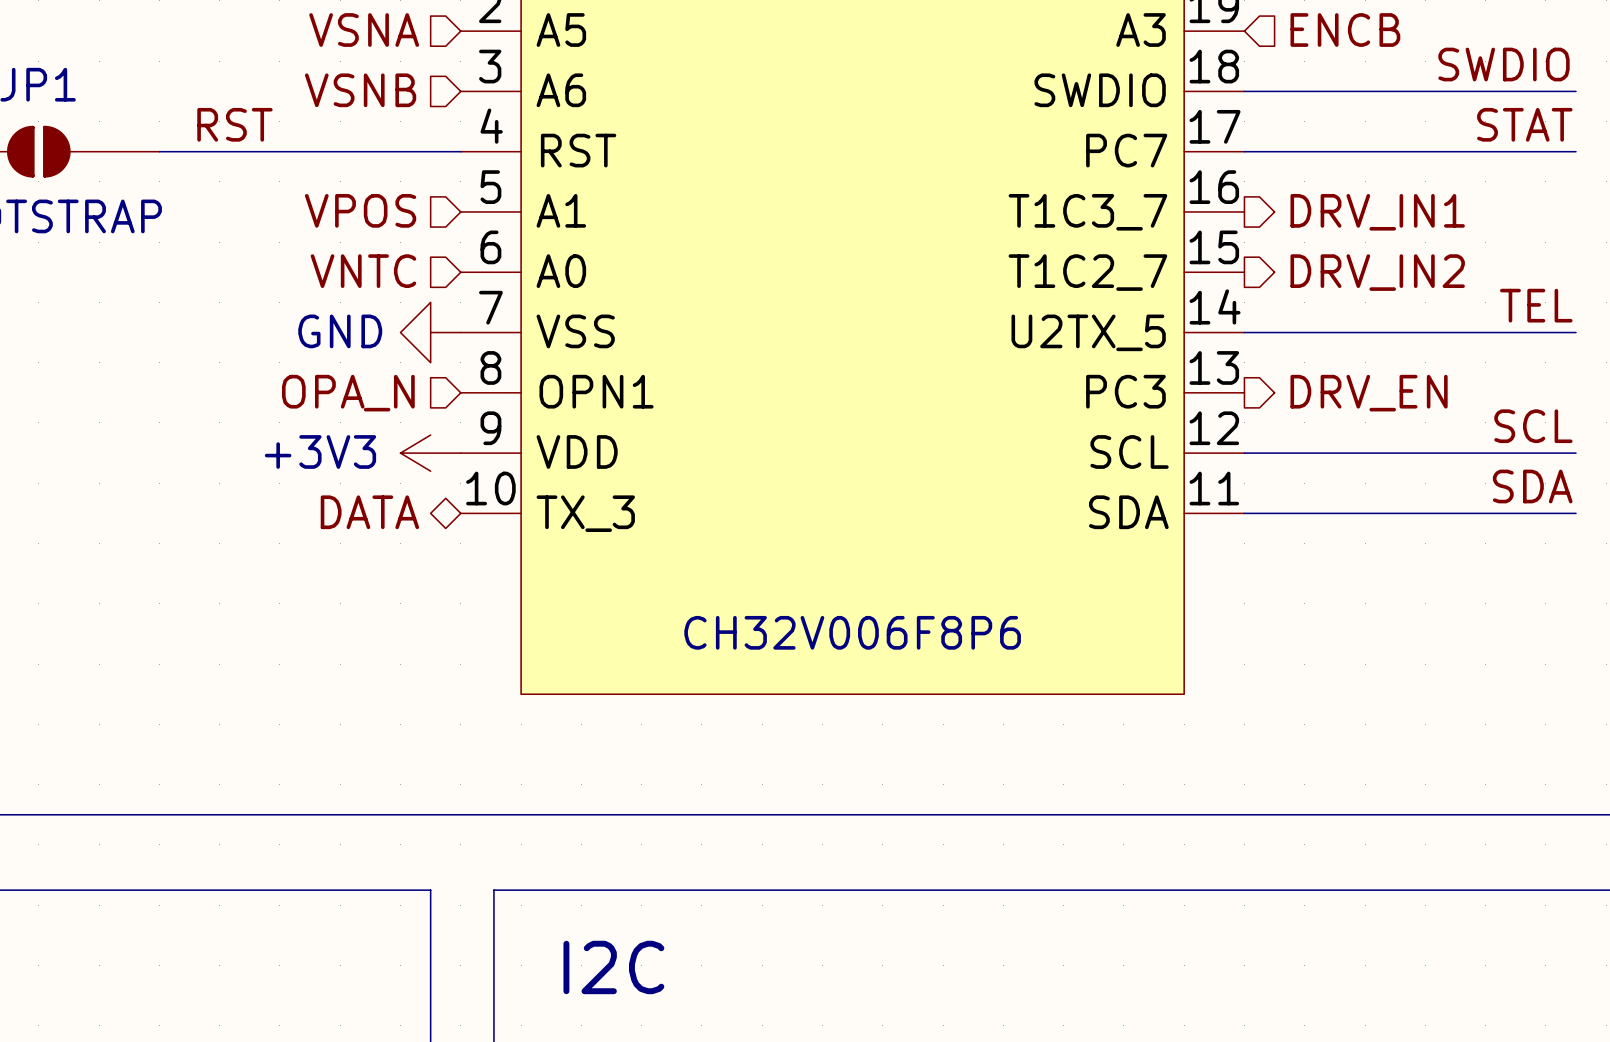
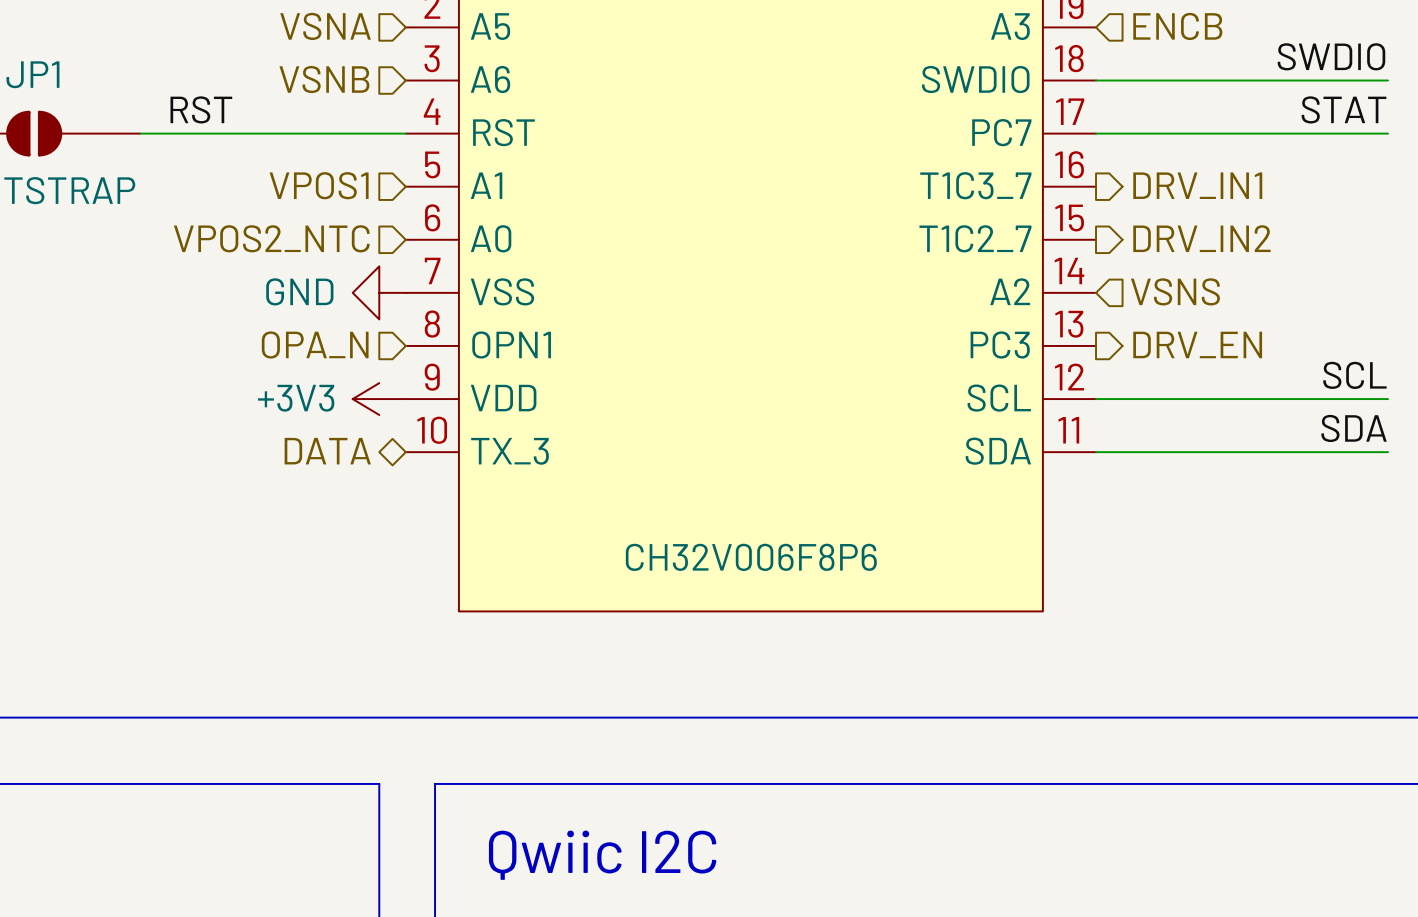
hierarchical label: VPOS (360, 210) -> VPOS1 (319, 185)
hierarchical label: VNTC (363, 271) -> VPOS2_NTC (271, 238)
label: TEL (1536, 305) -> none
hierarchical label: none -> VSNS (1175, 291)
part pin name: U2TX_5 (1088, 332) -> A2 (1010, 291)
wire: (1244, 332) (1575, 332) -> none
text: I2C (613, 967) -> Qwiic I2C (602, 855)

